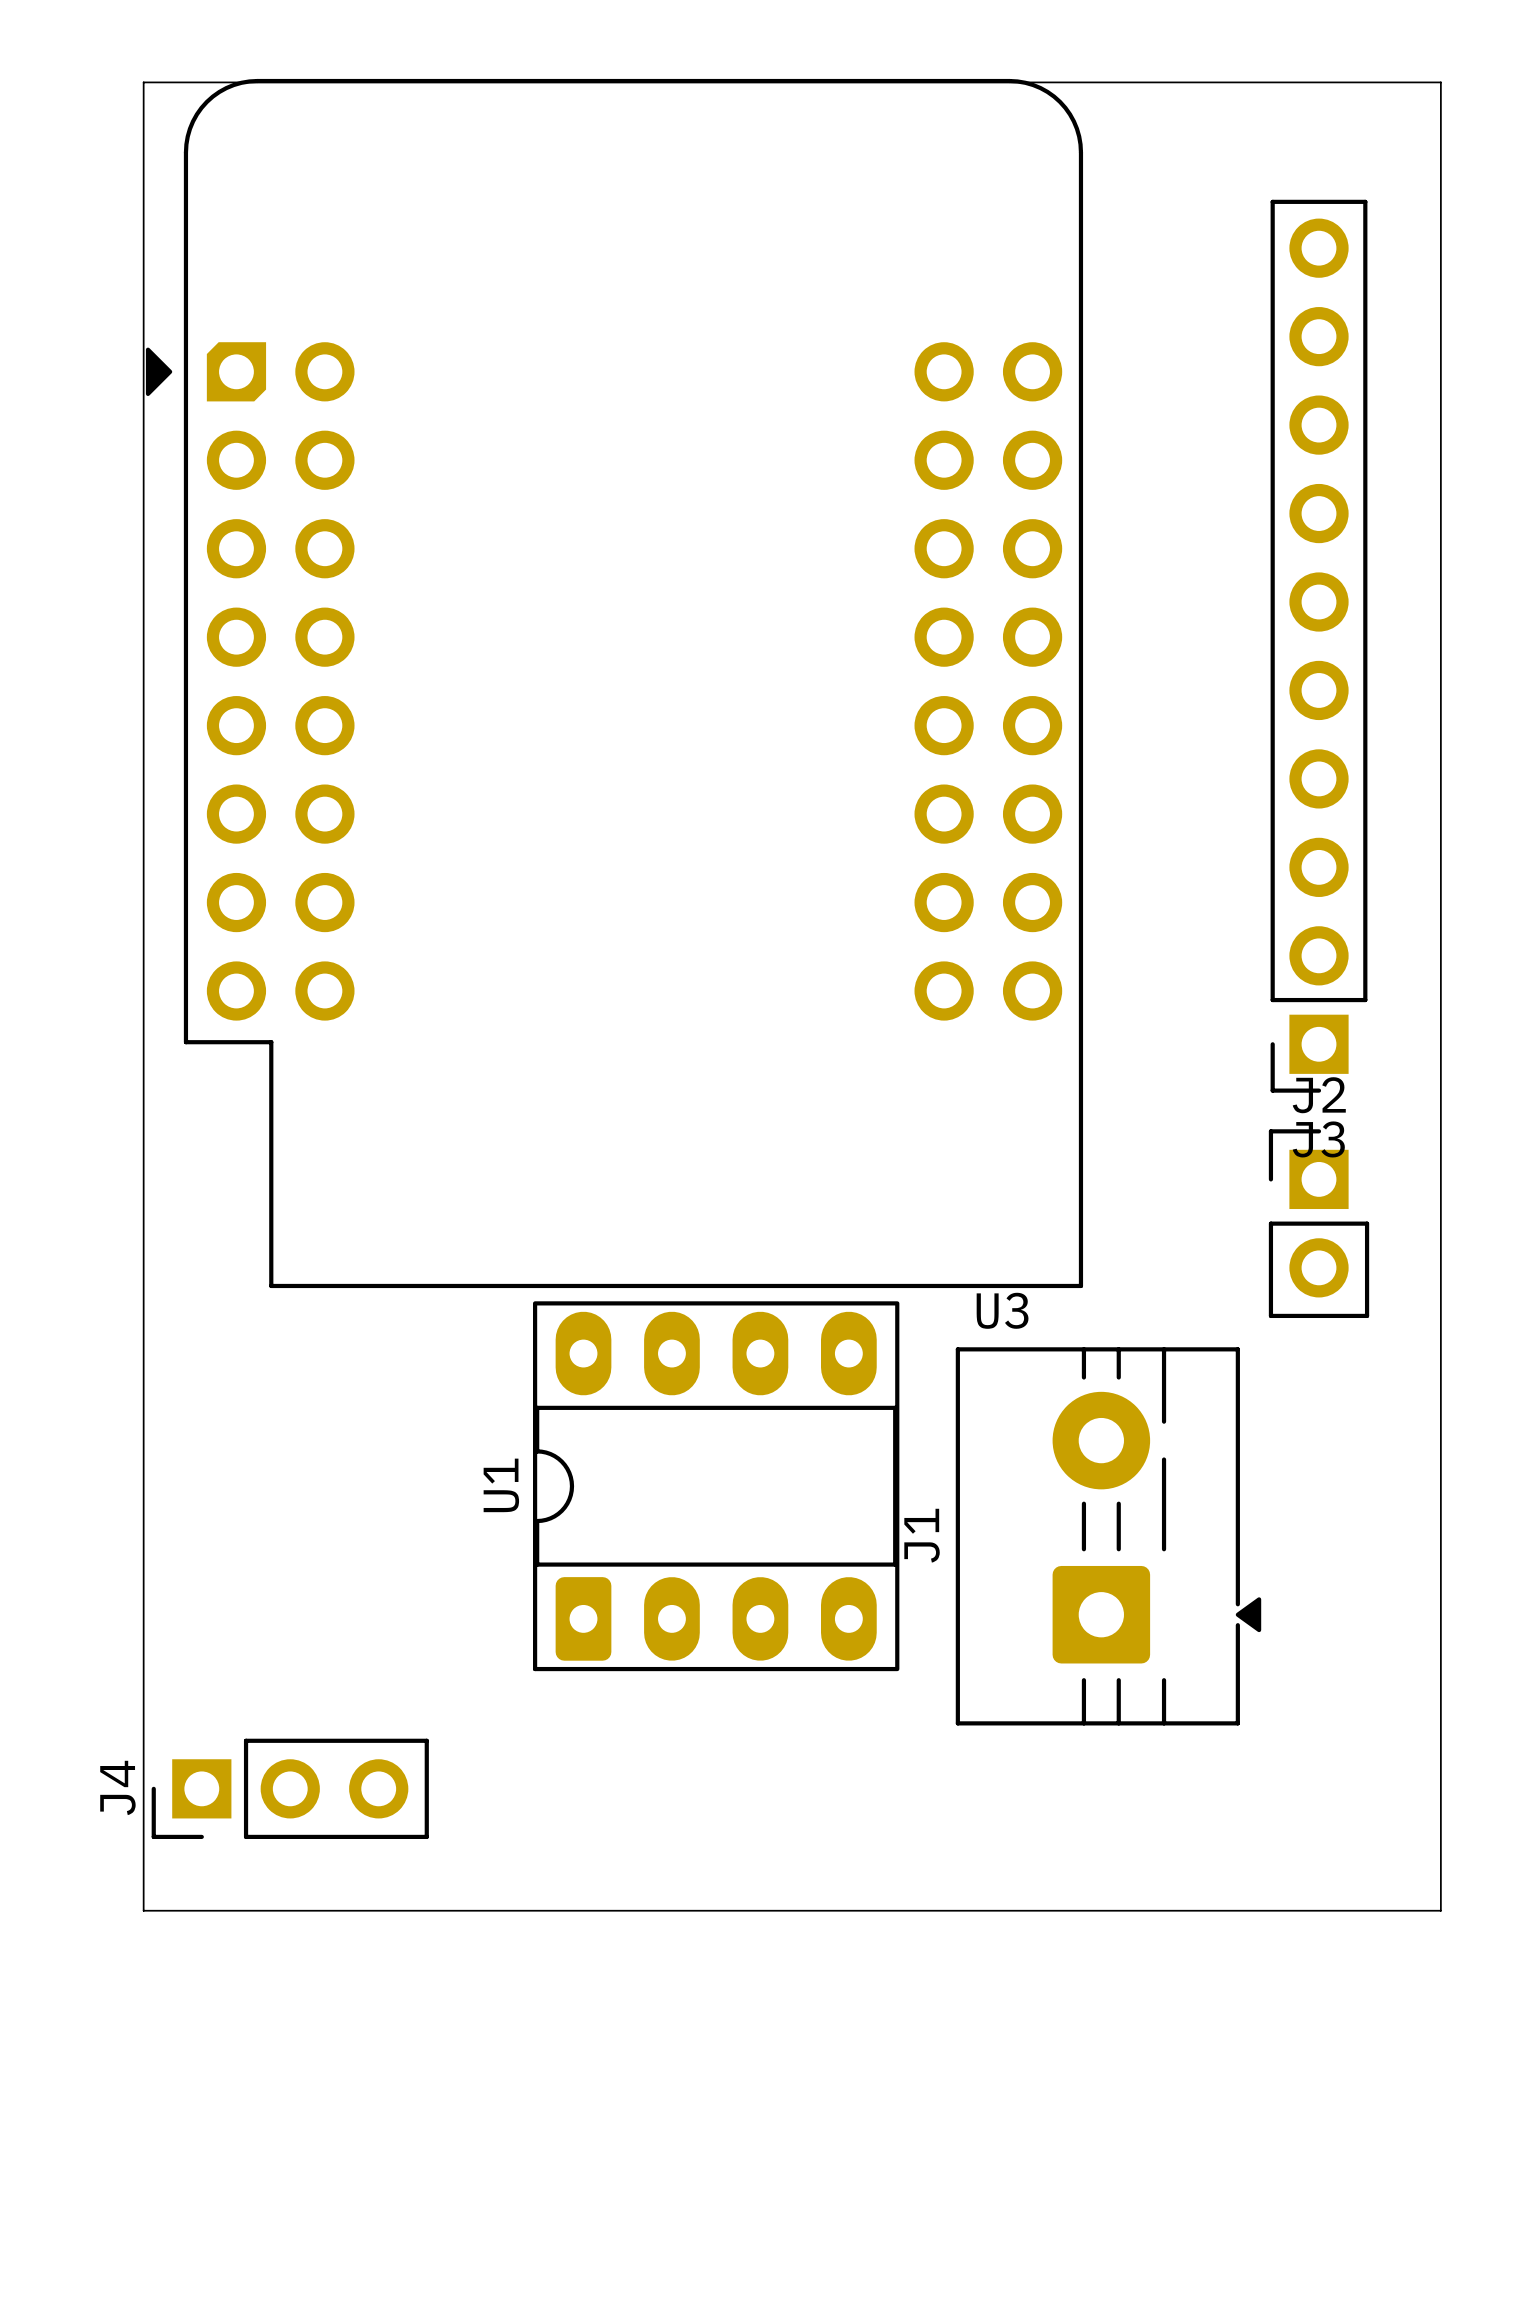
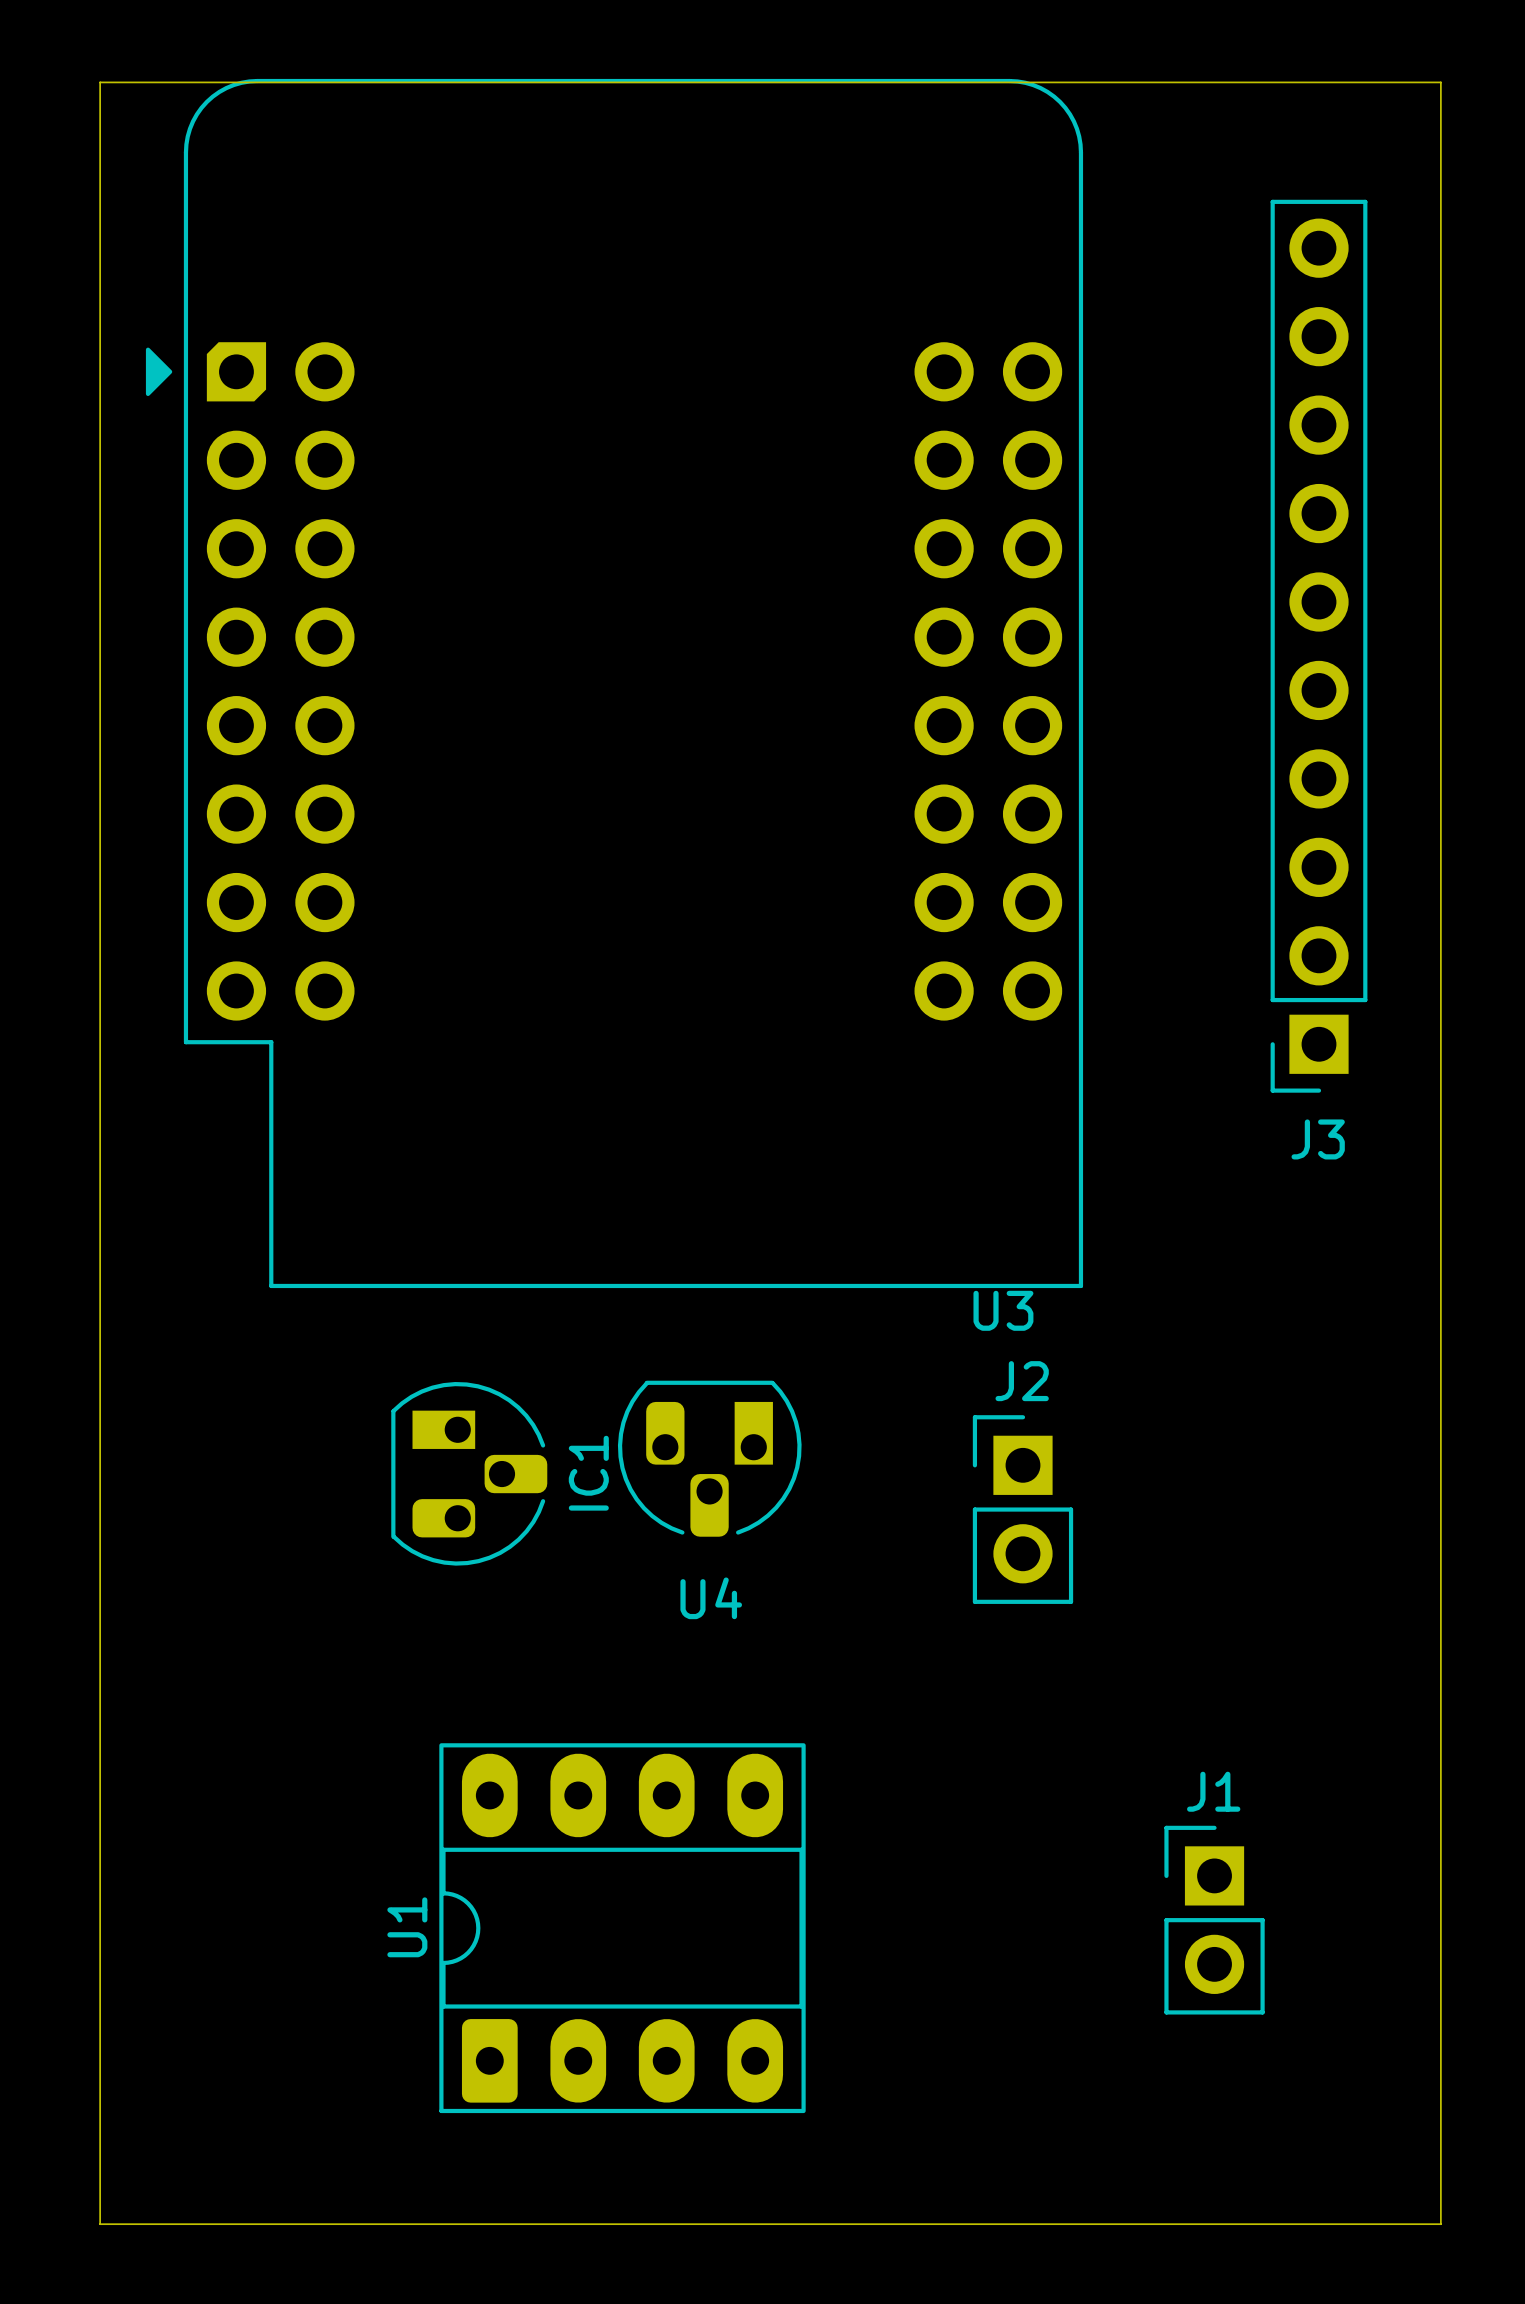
board edge: (143, 82) (143, 1910) (1440, 1910) -> (143, 82) (100, 82) (100, 2224) (1440, 2224) (1440, 1910)
J2 position: (1319, 1223) -> (1022, 1509)
J1 footprint: [955, 1347, 1262, 1726] -> [1164, 1825, 1265, 2015]
U4: none -> (709, 1458)
IC1: none -> (469, 1473)
U1 position: (716, 1486) -> (622, 1928)
J1 name position: J1 (922, 1535) -> J1 (1213, 1791)
J4: (290, 1788) -> none

